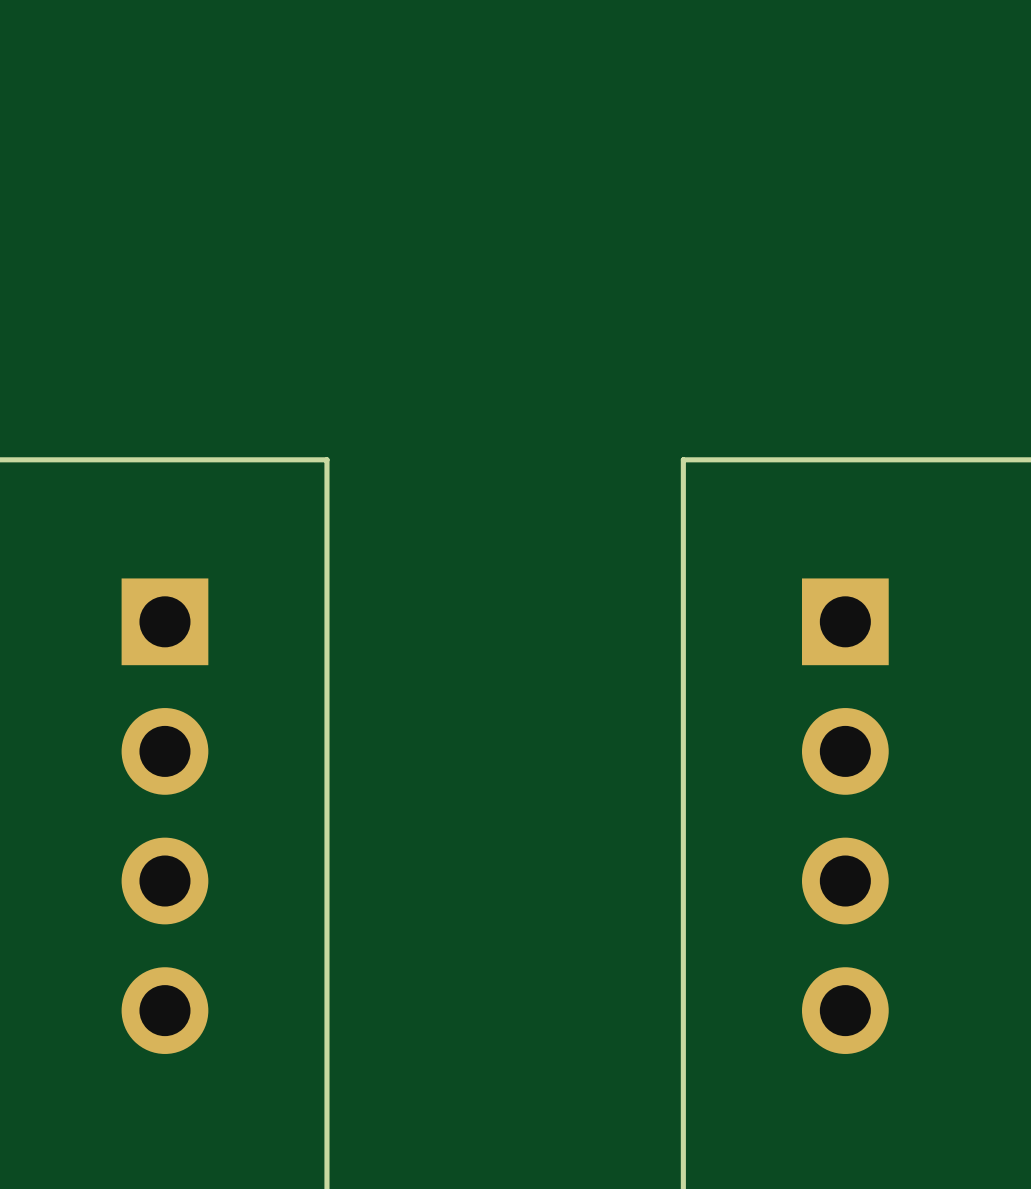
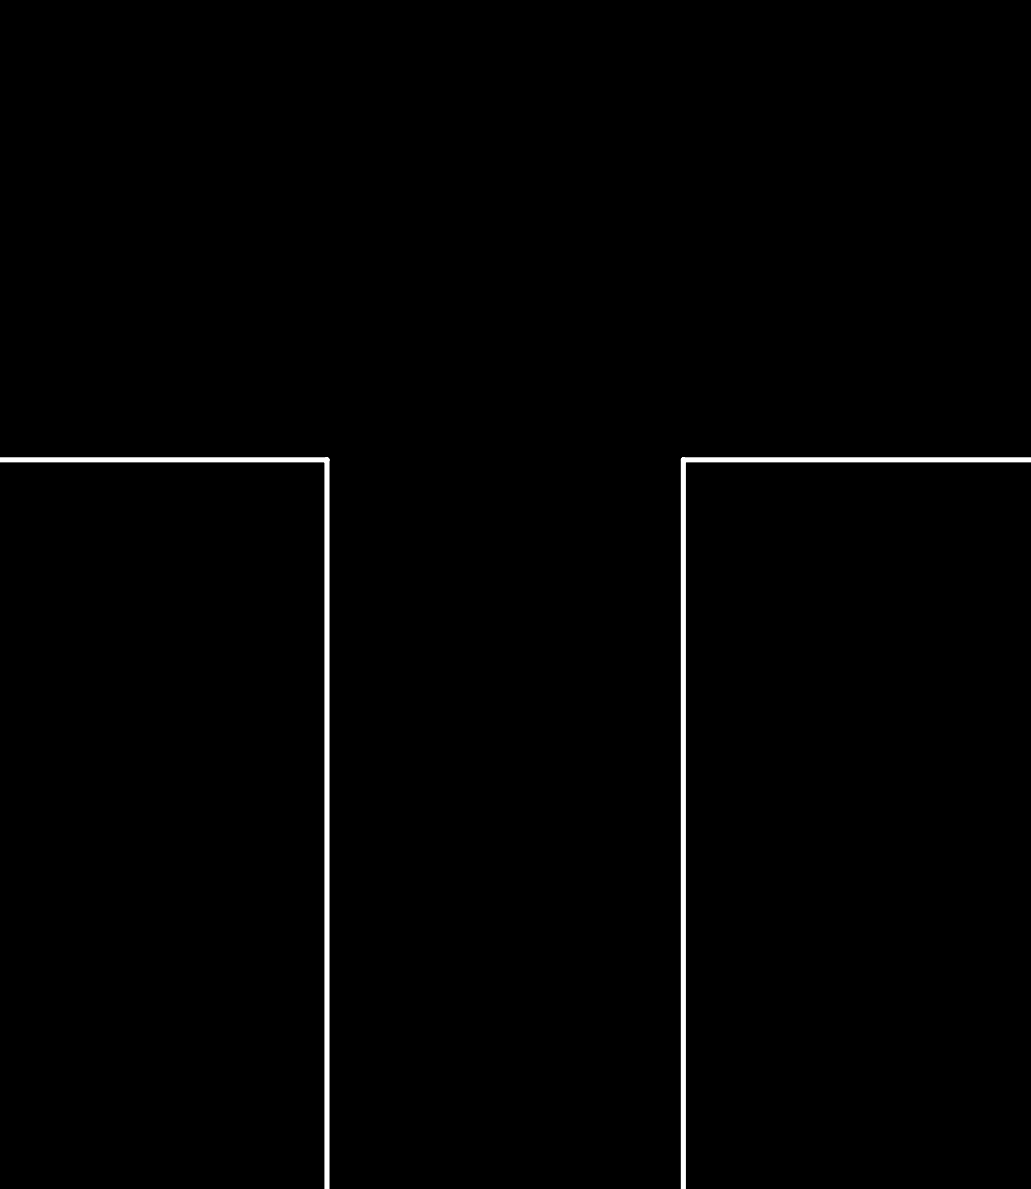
part: (164, 816) -> none
part: (845, 816) -> none

